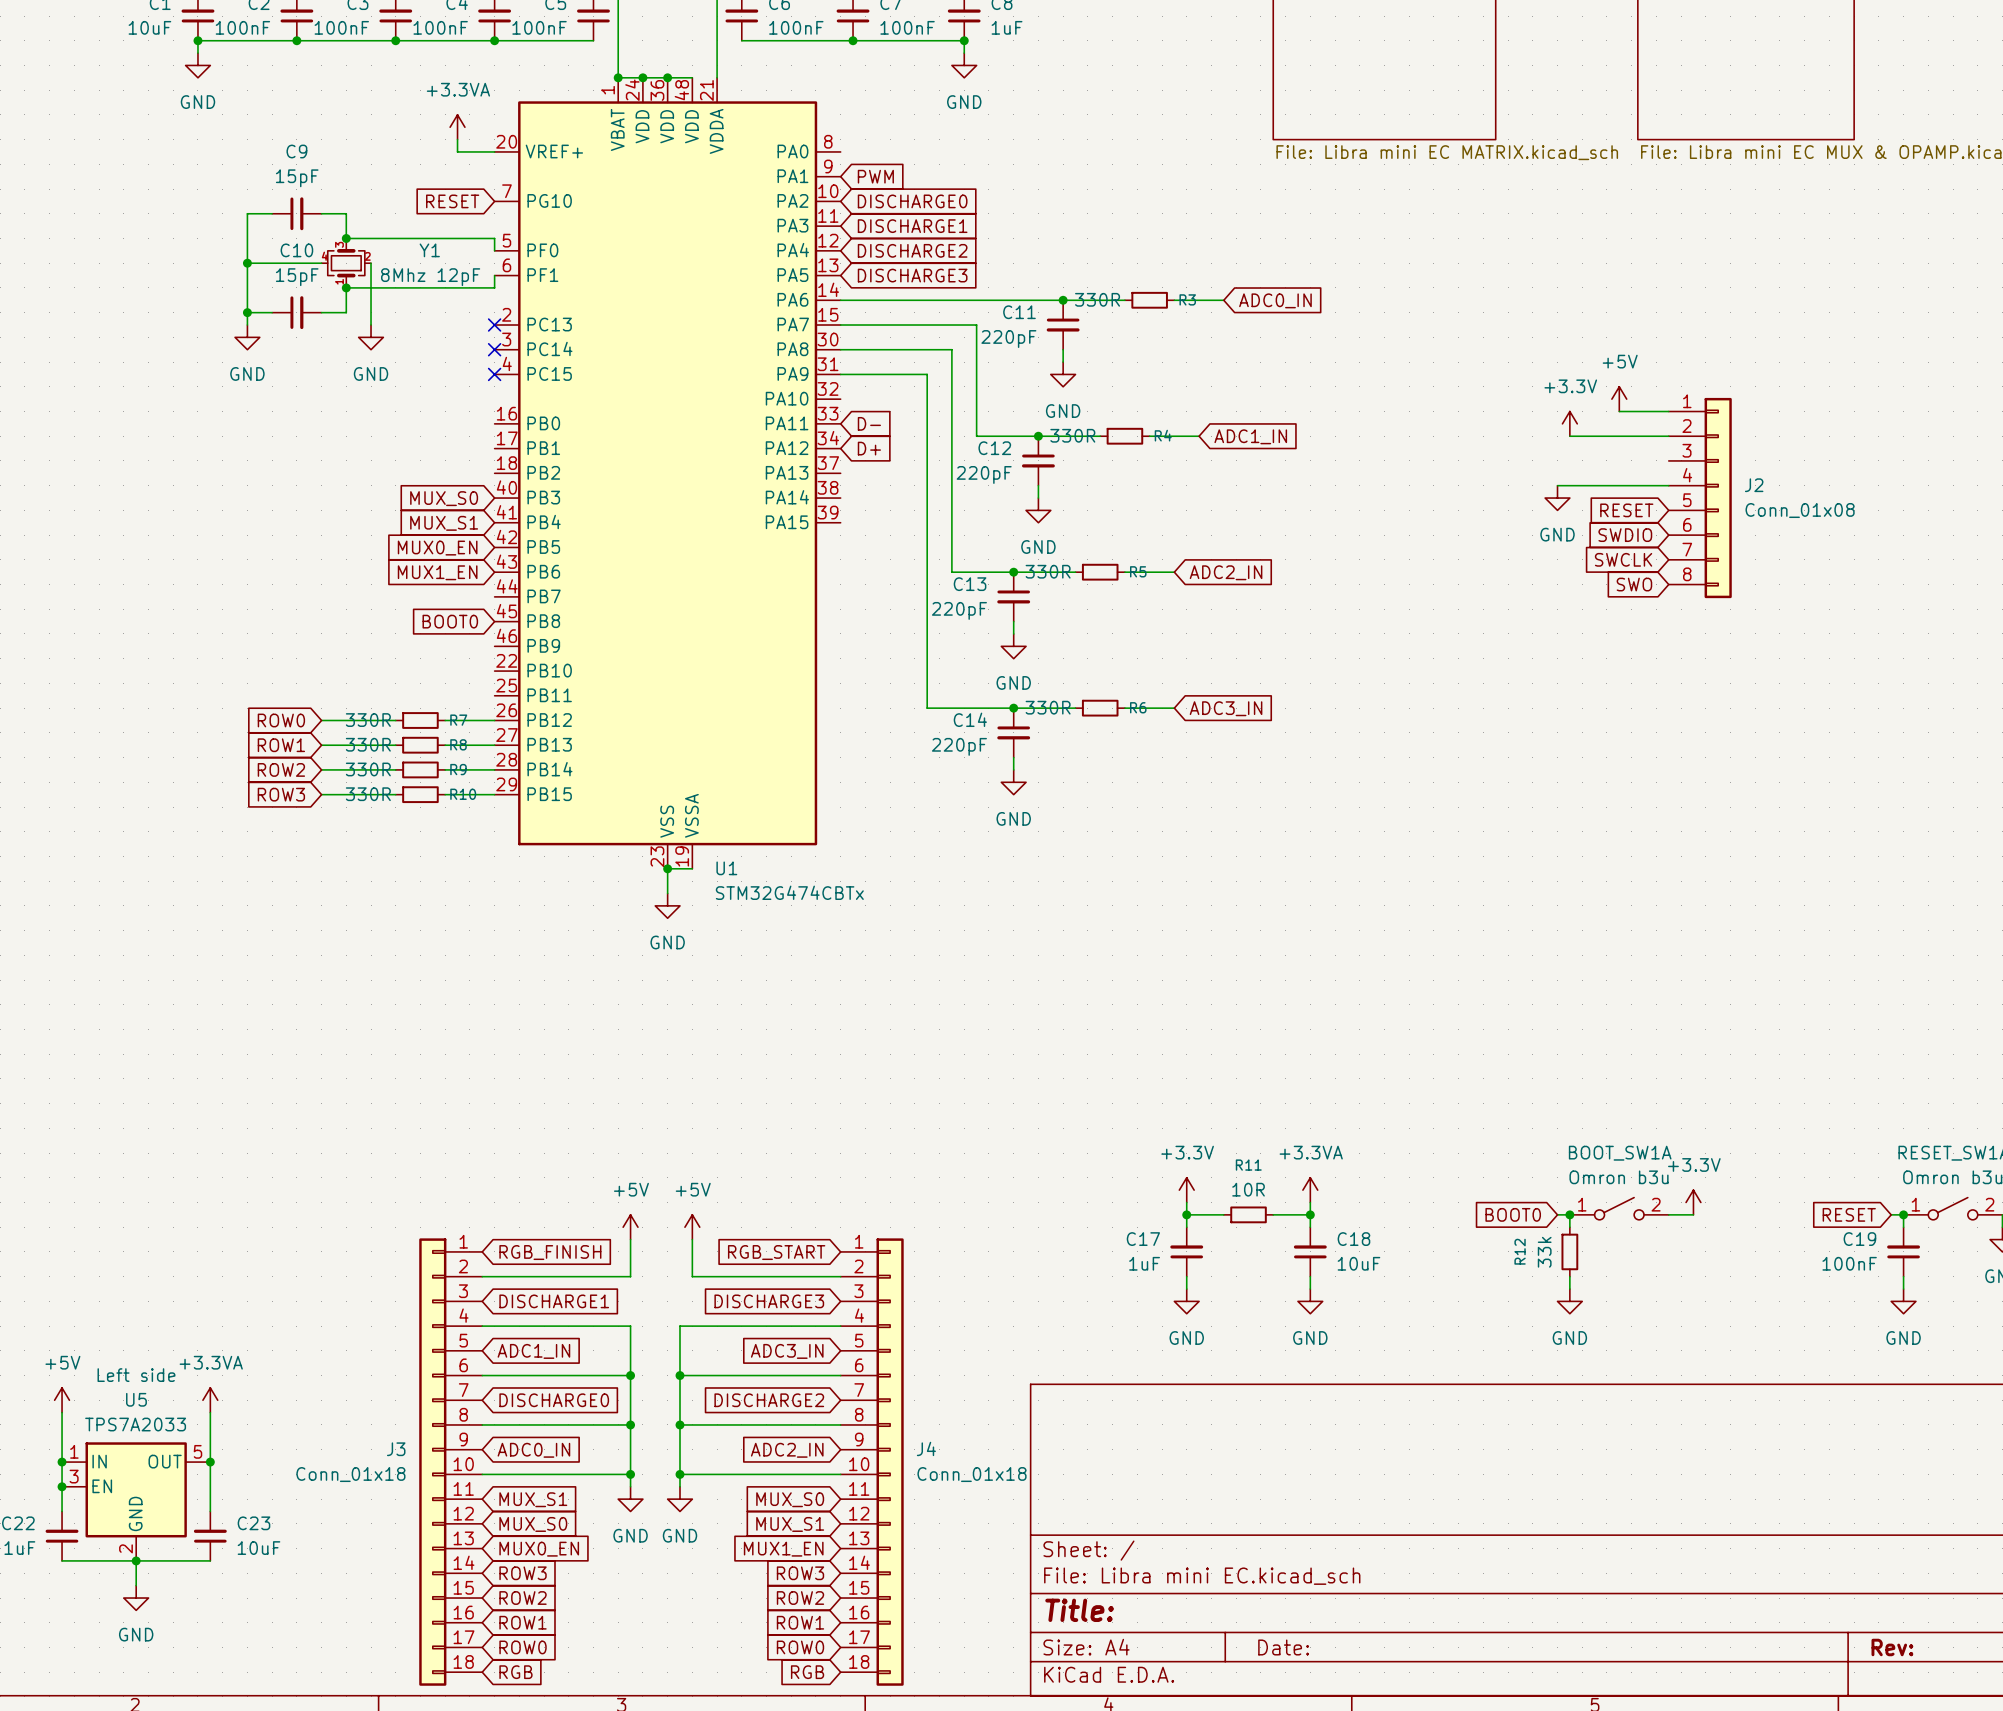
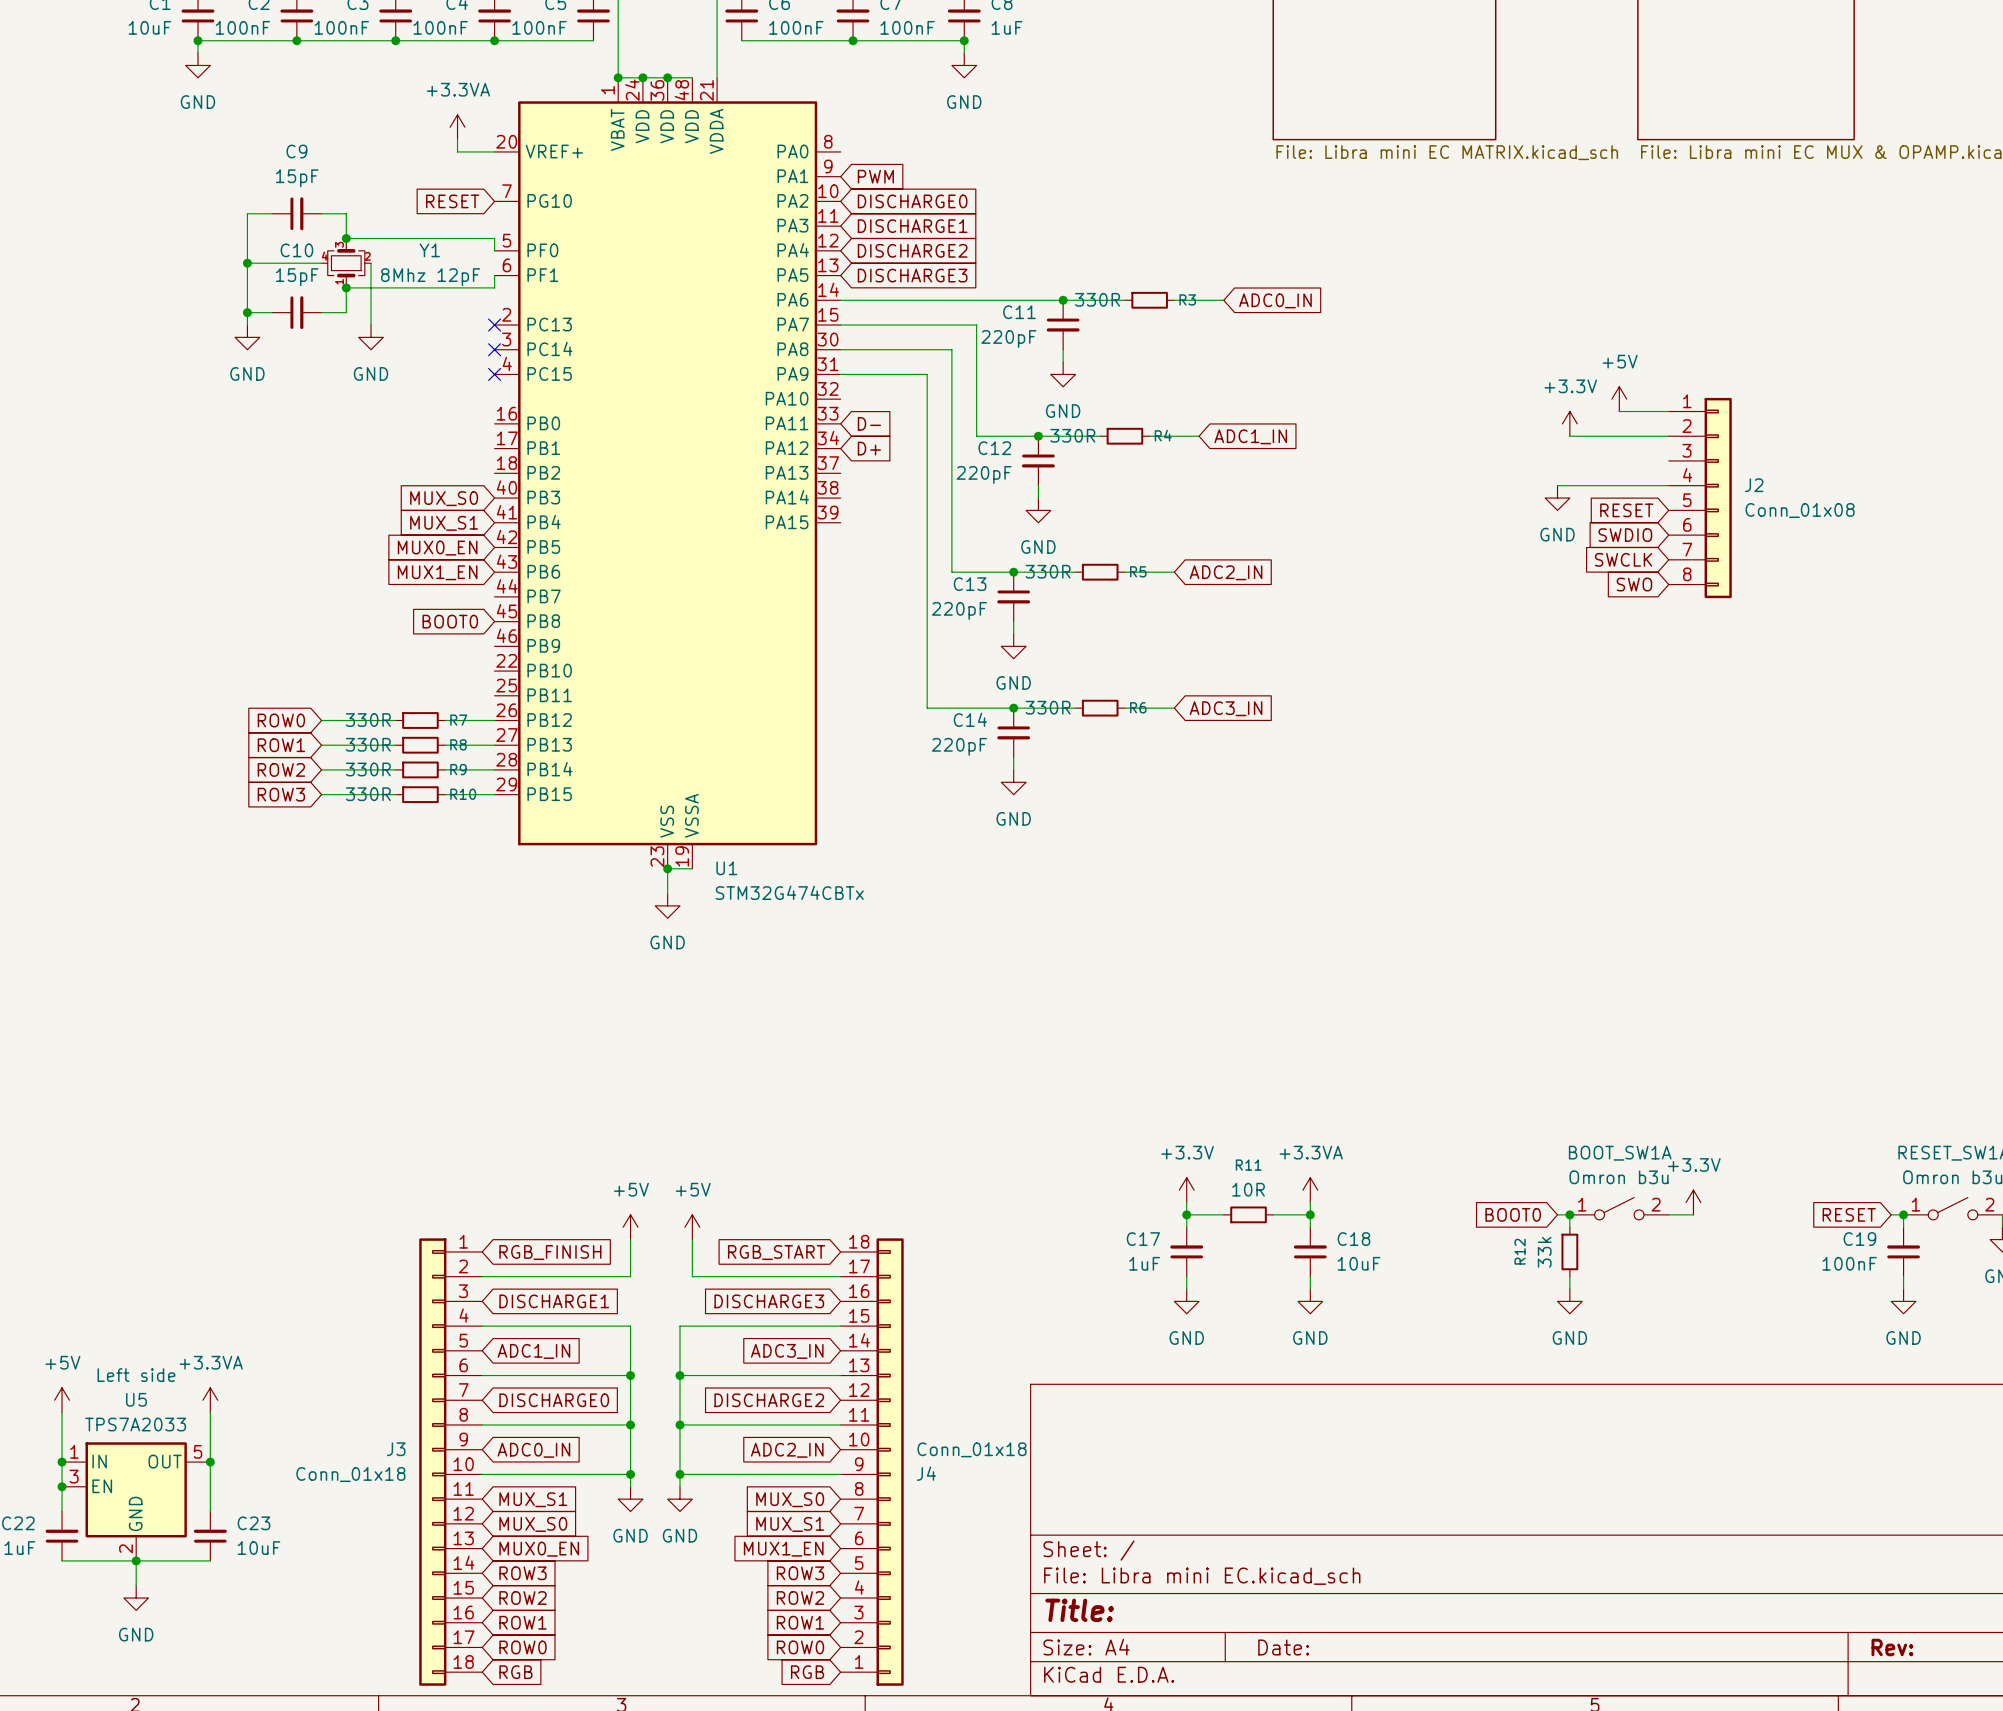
J4 flip: as is (890, 1462) -> up-down (890, 1462)

